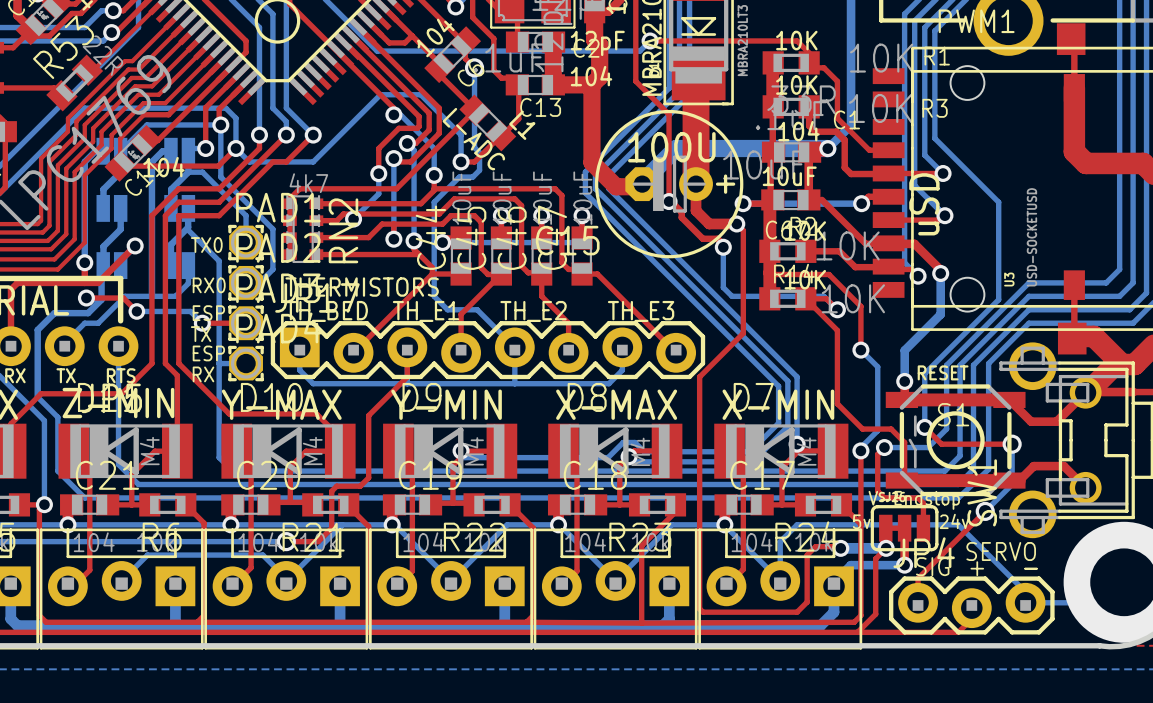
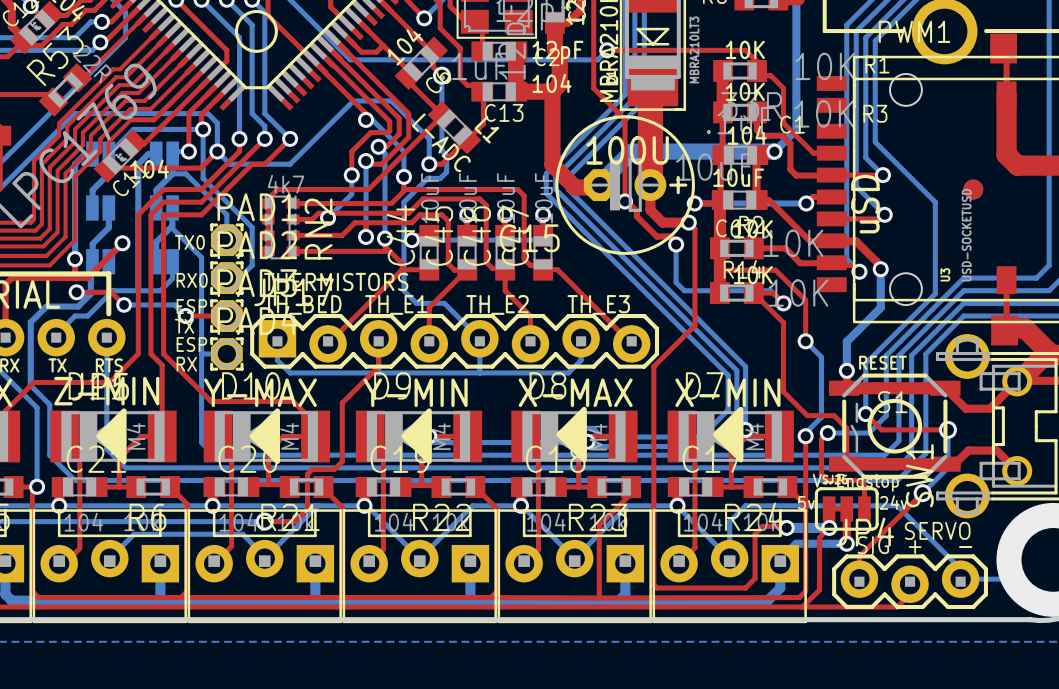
part: none -> (973, 189)
drawing: none -> [556, 406, 587, 463]
drawing: none -> [712, 406, 744, 463]
drawing: none -> [96, 408, 127, 465]
drawing: none -> [249, 408, 280, 465]
drawing: none -> [401, 408, 432, 465]

